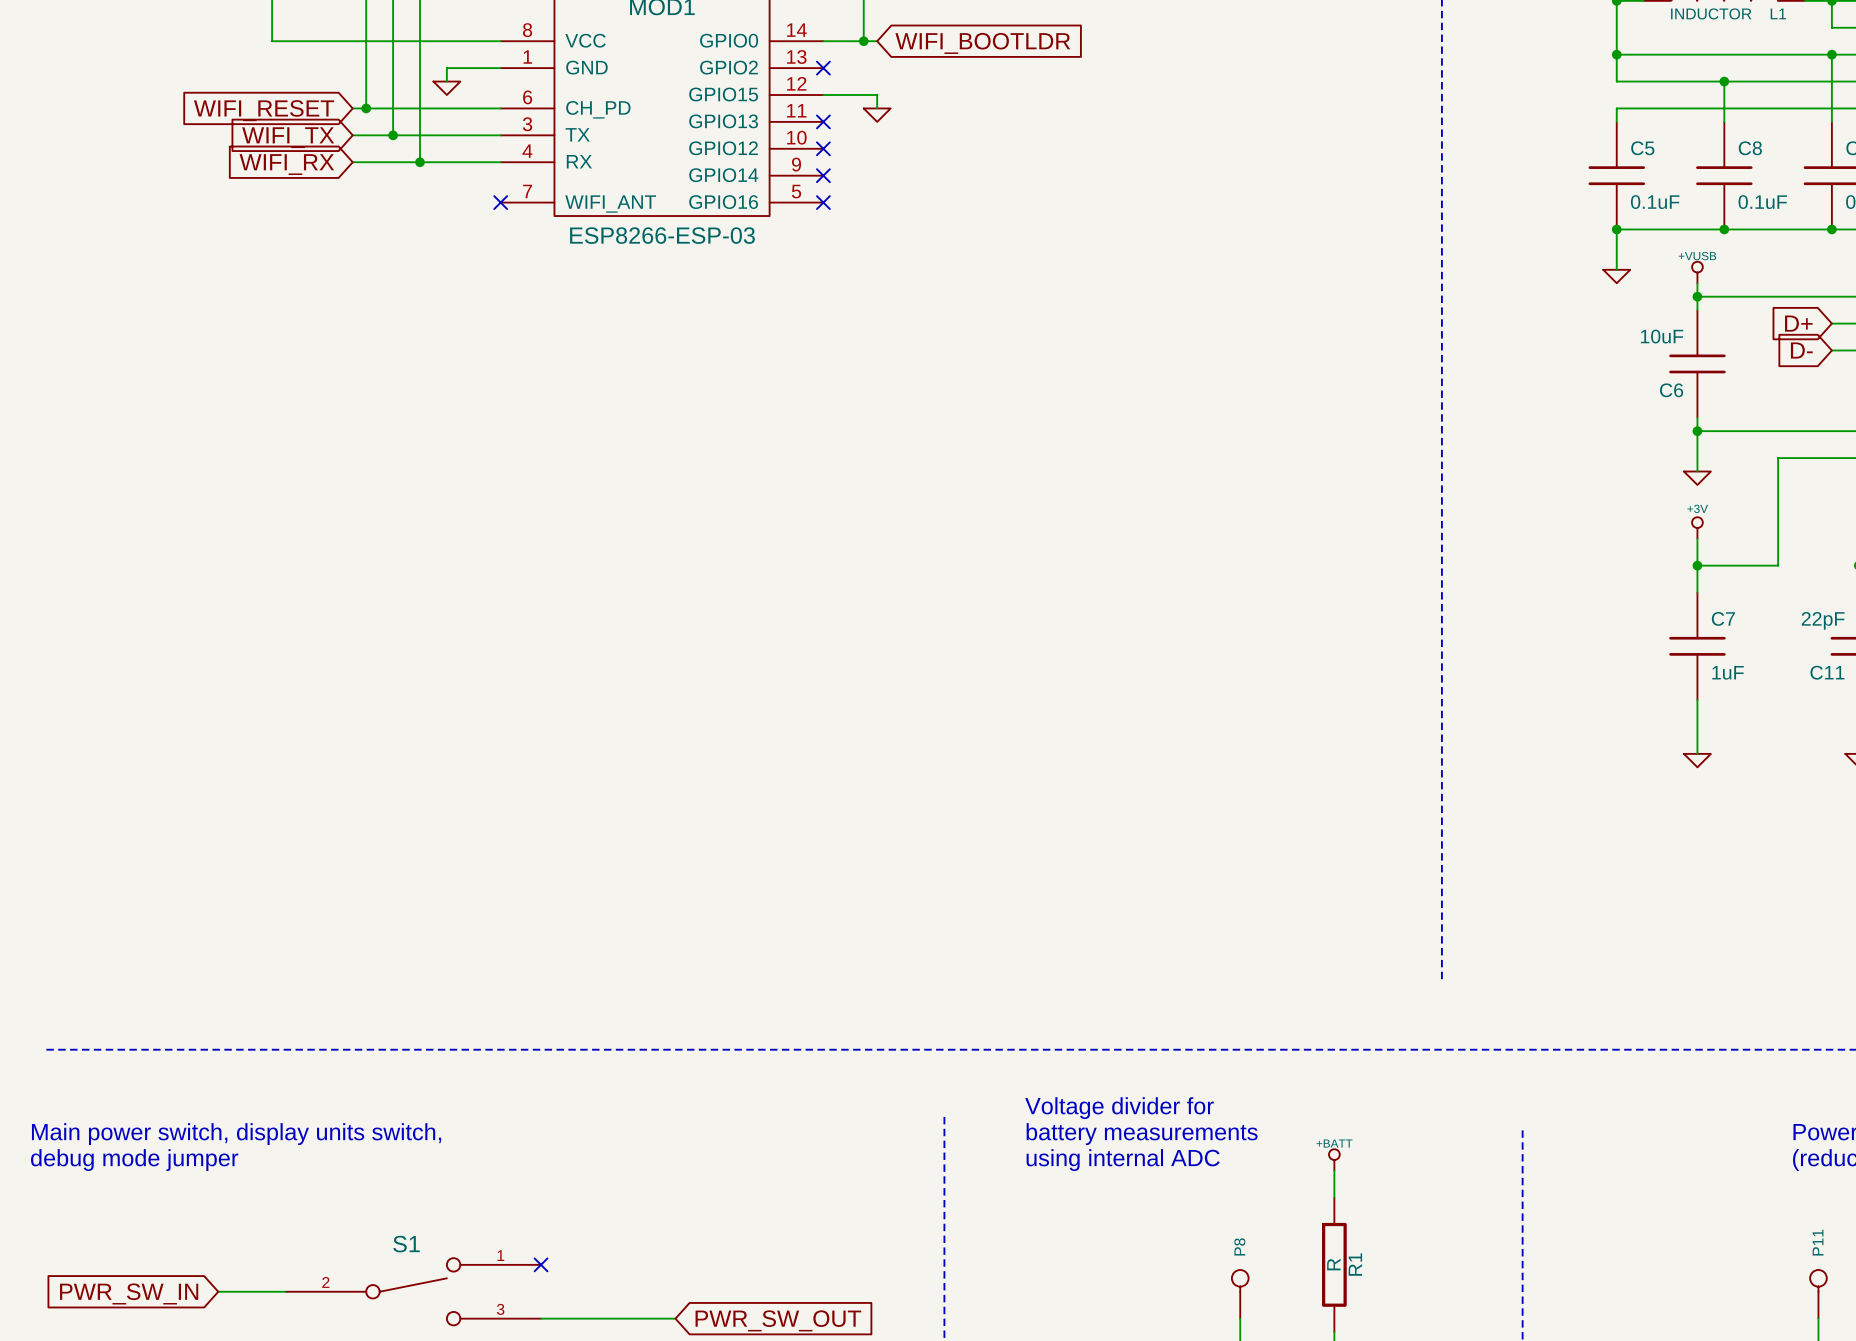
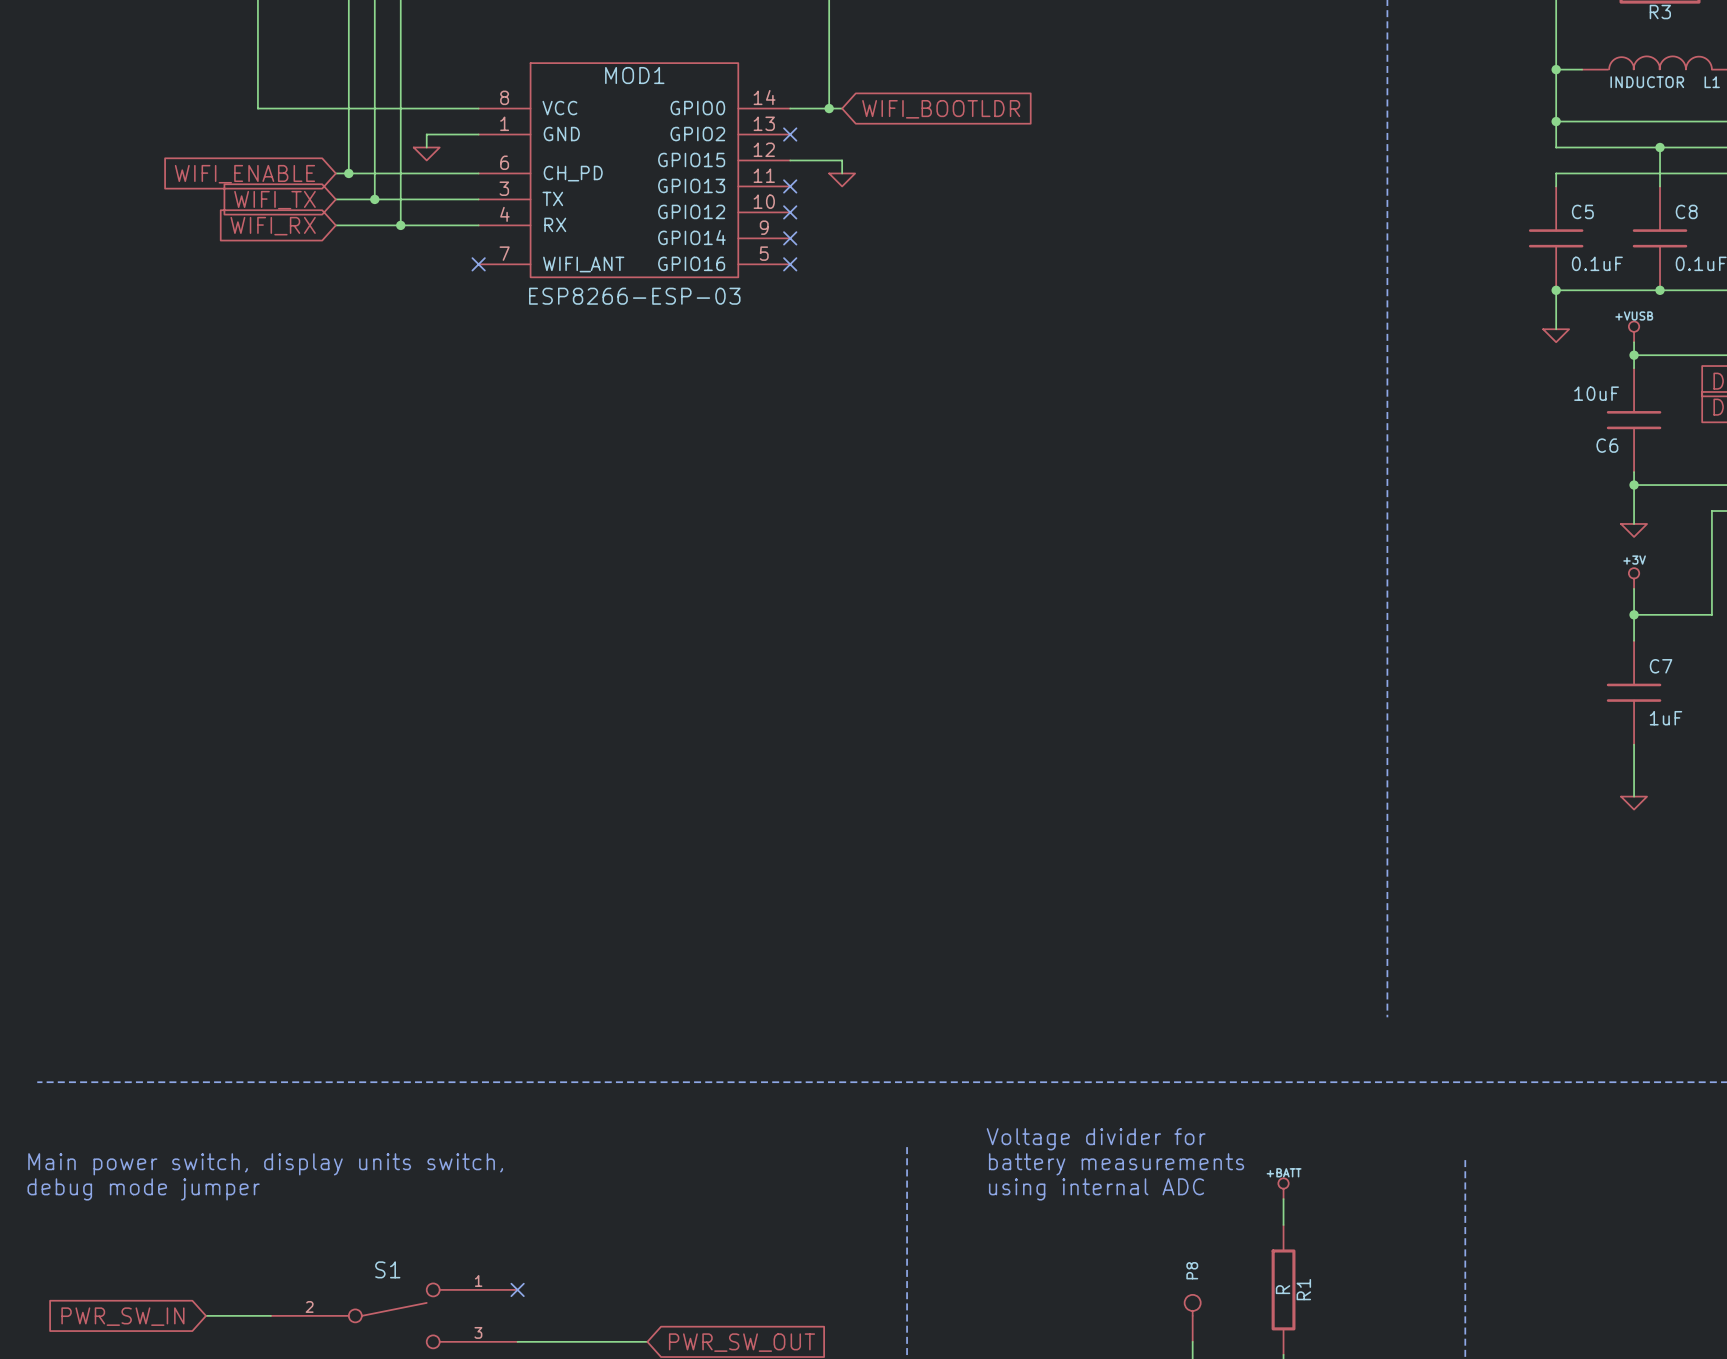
global label: WIFI_RESET (264, 110) -> WIFI_ENABLE (244, 174)

